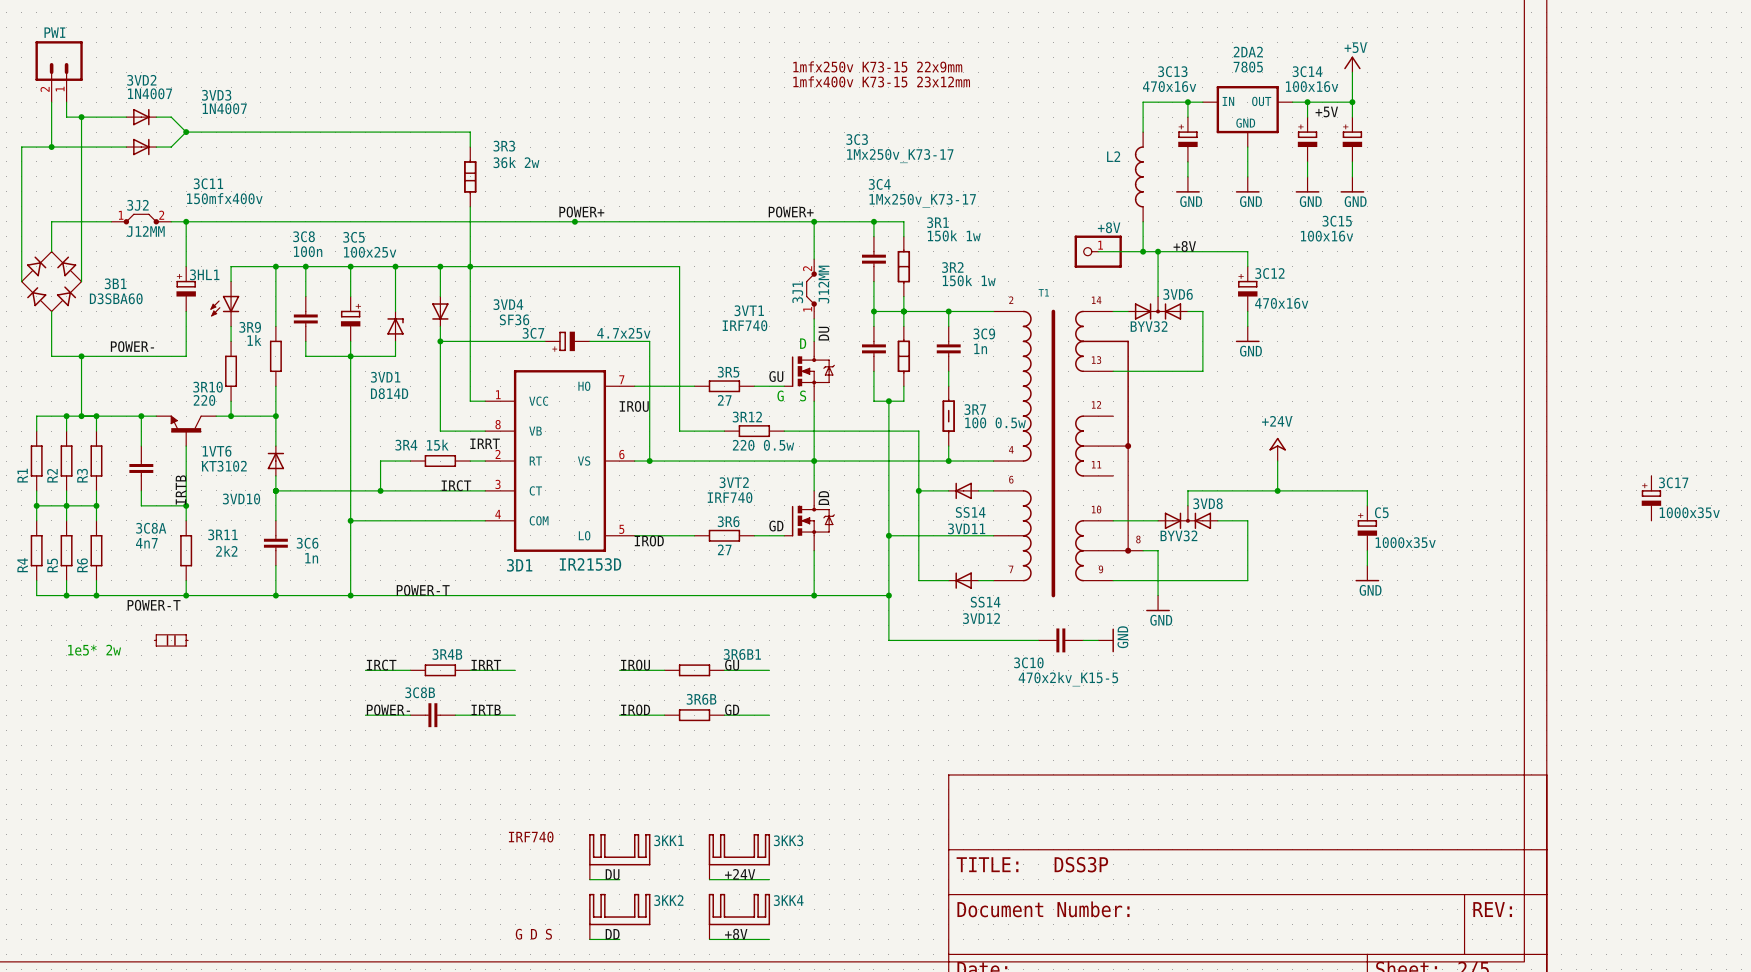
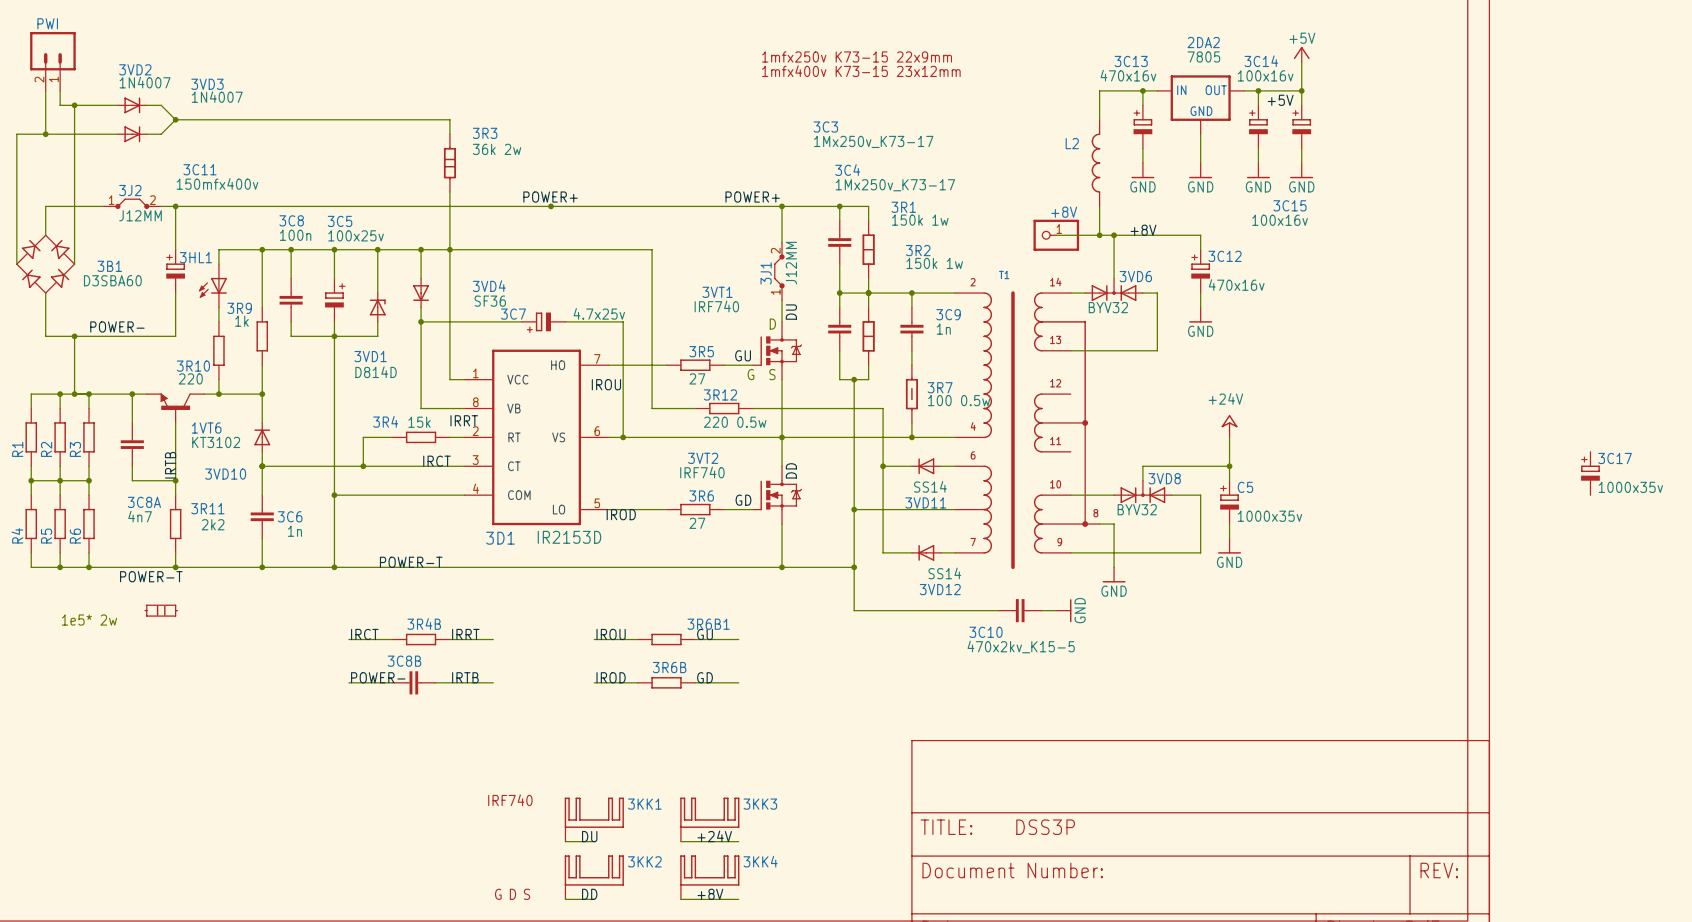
wire: (1277, 490) (1367, 490) (1367, 505) -> (1229, 466) (1229, 480)
C5 position: (1367, 528) -> (1229, 502)
wire: (1367, 550) (1367, 565) -> (1229, 524) (1229, 538)
power symbol position: GND (1367, 573) -> GND (1229, 546)

